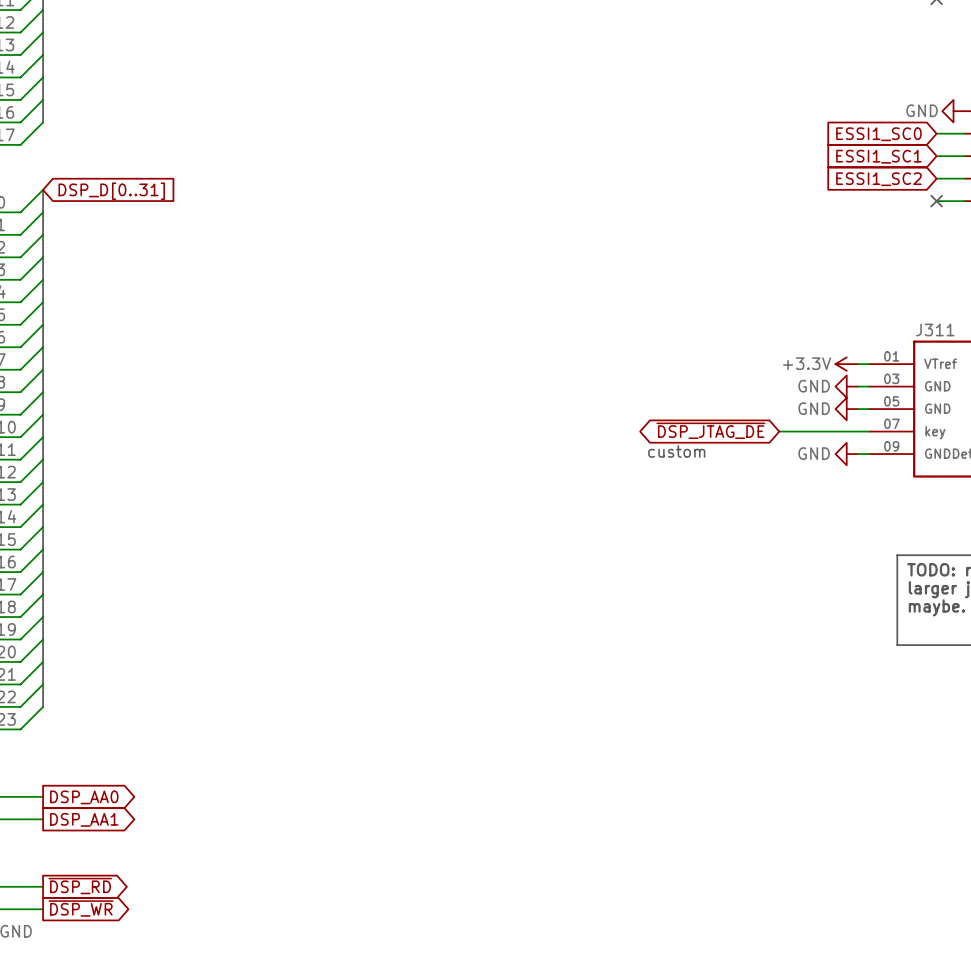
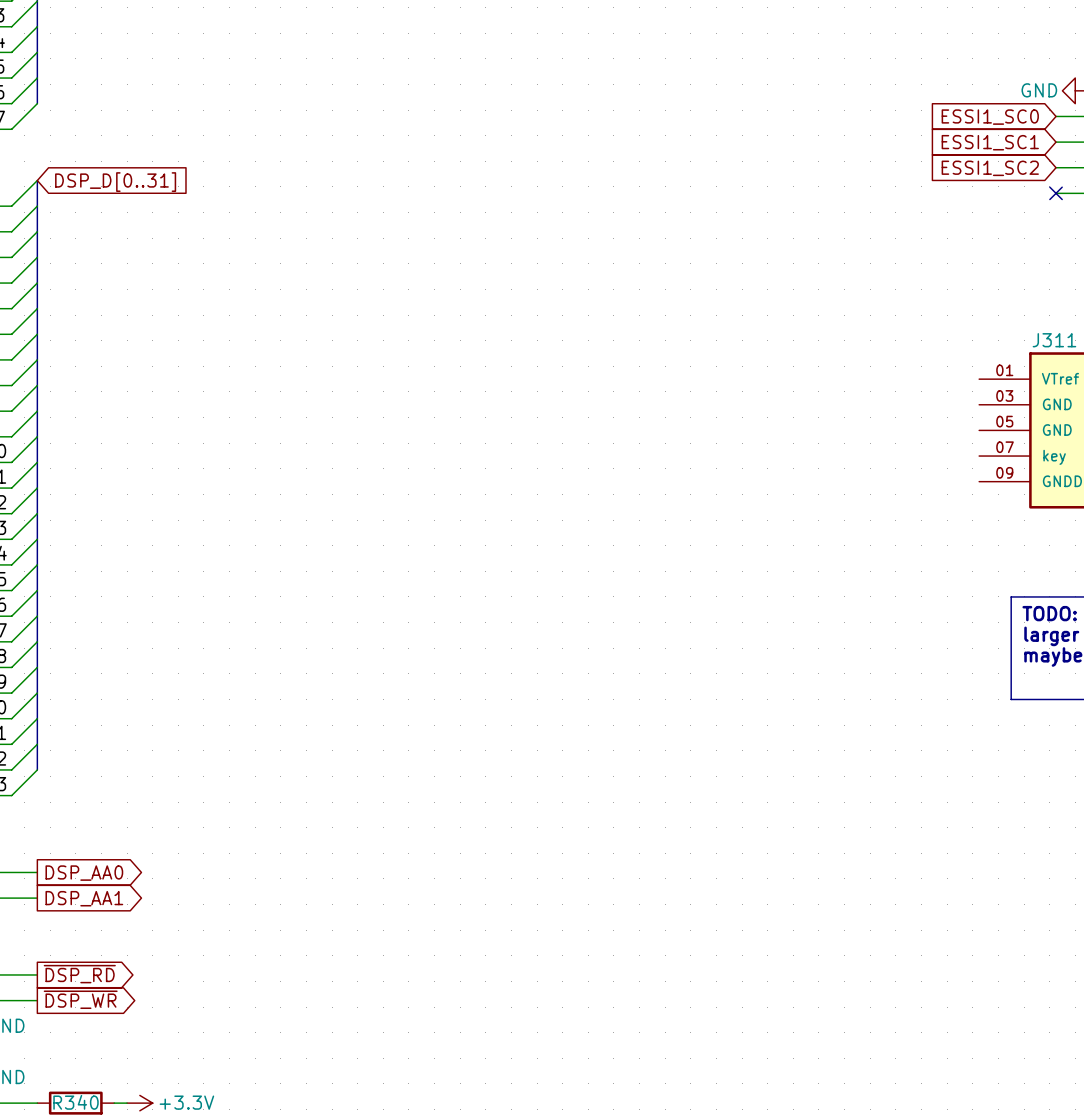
power symbol: +3.3V (846, 364) -> none
wire: (857, 364) (869, 364) -> none
power symbol: GND (846, 386) -> none
wire: (857, 386) (869, 386) -> none
power symbol: GND (846, 409) -> none
wire: (857, 409) (869, 409) -> none
global label: ~{DSP_JTAG_DE} (710, 430) -> none
wire: (779, 431) (869, 431) -> none
text: custom (676, 451) -> none
power symbol: GND (846, 454) -> none
wire: (857, 454) (869, 454) -> none

